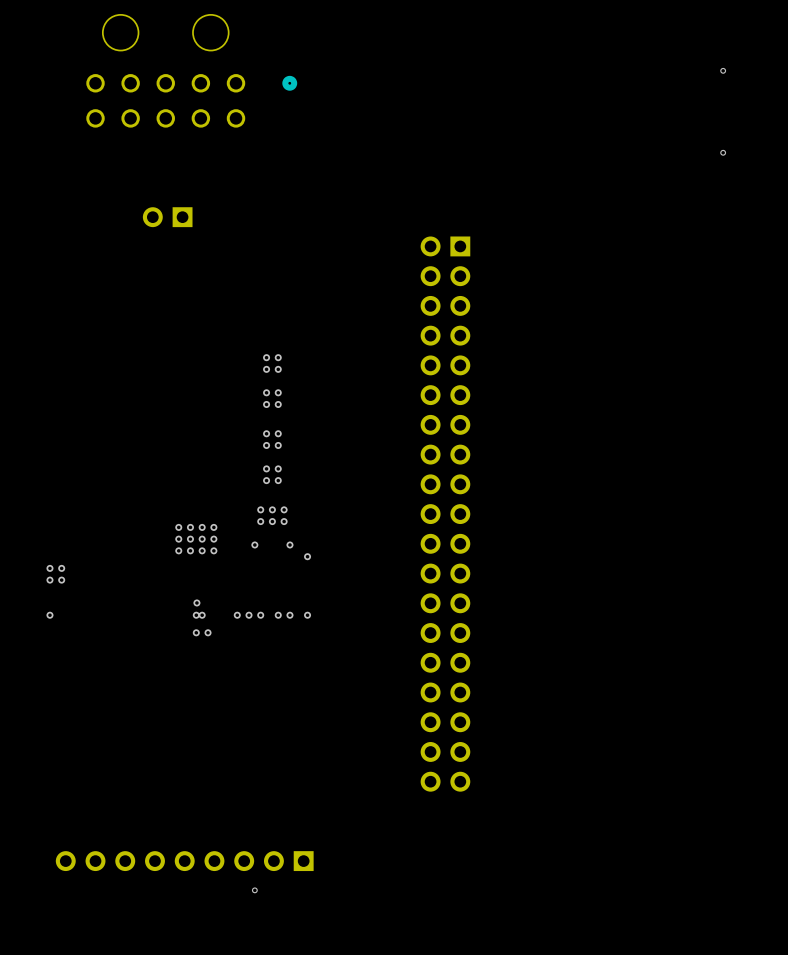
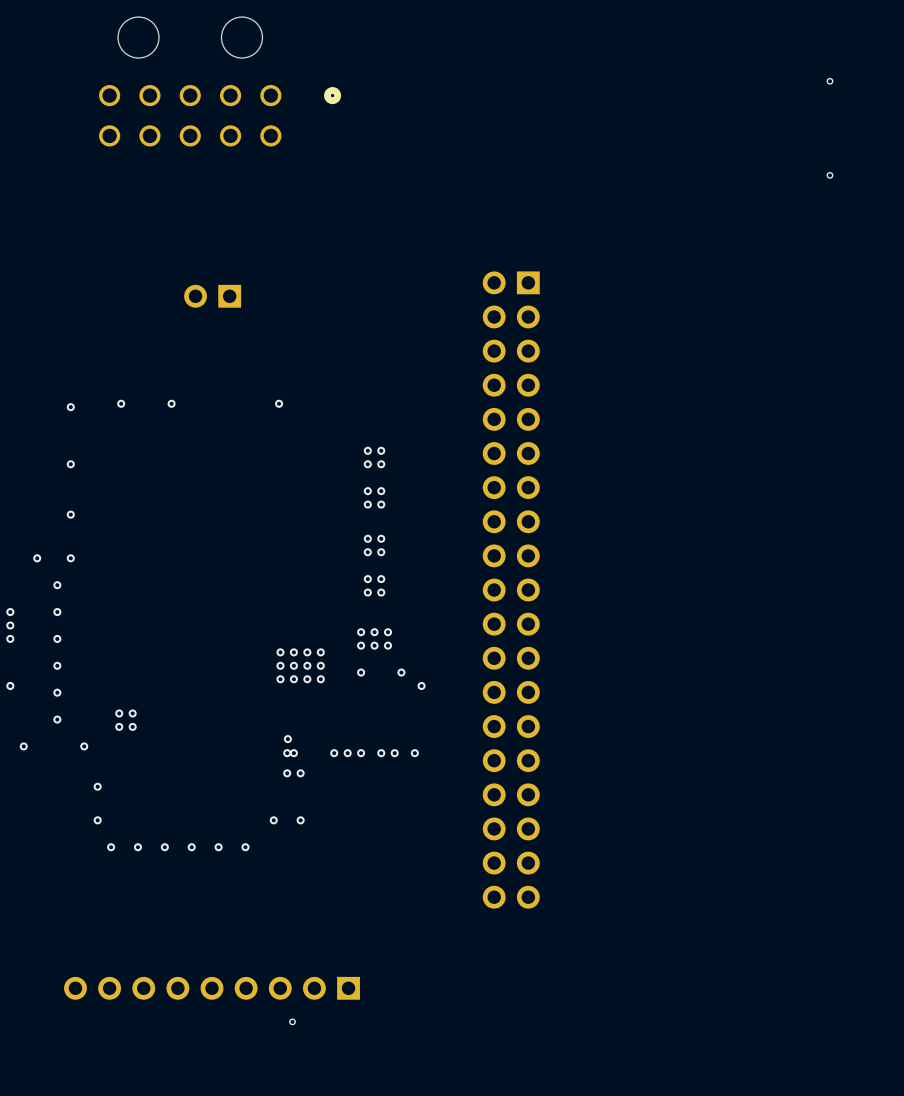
part position: (167, 217) -> (212, 296)
via: none -> (121, 403)
via: none -> (171, 403)
via: none -> (279, 403)
via: none -> (70, 407)
via: (266, 357) -> none
via: (278, 357) -> none
via: (266, 369) -> none
via: (278, 369) -> none
via: (266, 392) -> none
via: (278, 392) -> none
via: none -> (367, 450)
via: none -> (381, 450)
via: none -> (70, 464)
via: (266, 404) -> none
via: (278, 404) -> none
via: none -> (367, 464)
via: none -> (381, 464)
via: none -> (367, 491)
via: none -> (381, 491)
via: (266, 433) -> none
via: (278, 433) -> none
via: none -> (367, 504)
via: none -> (381, 504)
via: (266, 445) -> none
via: (278, 445) -> none
via: none -> (70, 514)
via: (266, 468) -> none
via: (278, 468) -> none
via: none -> (367, 538)
via: none -> (381, 538)
via: (266, 480) -> none
via: (278, 480) -> none
via: none -> (367, 552)
via: none -> (381, 552)
via: none -> (37, 558)
via: none -> (70, 558)
via: none -> (367, 579)
via: none -> (381, 579)
via: none -> (57, 585)
via: (260, 509) -> none
via: (272, 509) -> none
via: (284, 509) -> none
via: none -> (367, 592)
via: none -> (381, 592)
via: (260, 521) -> none
via: (272, 521) -> none
via: (284, 521) -> none
via: (178, 527) -> none
via: (190, 527) -> none
via: (202, 527) -> none
via: (213, 527) -> none
via: none -> (10, 612)
via: none -> (57, 612)
via: (178, 539) -> none
via: (190, 539) -> none
via: (202, 539) -> none
via: (213, 539) -> none
via: none -> (10, 625)
via: (254, 544) -> none
via: (289, 544) -> none
via: (178, 550) -> none
via: (190, 550) -> none
via: (202, 550) -> none
via: (213, 550) -> none
via: none -> (361, 632)
via: none -> (374, 632)
via: none -> (387, 632)
via: none -> (10, 638)
via: none -> (57, 638)
via: (307, 556) -> none
via: none -> (361, 645)
via: none -> (374, 645)
via: none -> (387, 645)
via: (49, 568) -> none
via: (61, 568) -> none
via: none -> (280, 652)
via: none -> (293, 652)
via: none -> (307, 652)
via: none -> (320, 652)
via: (61, 580) -> none
via: none -> (280, 665)
via: none -> (293, 665)
via: none -> (307, 665)
via: none -> (320, 665)
via: none -> (361, 672)
via: none -> (401, 672)
via: none -> (280, 679)
via: none -> (293, 679)
via: none -> (307, 679)
via: none -> (320, 679)
via: none -> (10, 685)
via: none -> (421, 685)
via: (196, 602) -> none
via: none -> (57, 692)
via: (49, 615) -> none
via: (196, 615) -> none
via: (202, 615) -> none
via: (237, 615) -> none
via: (249, 615) -> none
via: (260, 615) -> none
via: (278, 615) -> none
via: (289, 615) -> none
via: (307, 615) -> none
via: none -> (119, 713)
via: none -> (132, 713)
via: none -> (57, 719)
via: (196, 632) -> none
via: (208, 632) -> none
via: none -> (119, 726)
via: none -> (132, 726)
via: none -> (287, 739)
via: none -> (23, 746)
via: none -> (84, 746)
via: none -> (287, 753)
via: none -> (293, 753)
via: none -> (334, 753)
via: none -> (347, 753)
via: none -> (361, 753)
via: none -> (381, 753)
via: none -> (394, 753)
via: none -> (414, 753)
via: none -> (287, 773)
via: none -> (300, 773)
via: none -> (97, 786)
via: none -> (97, 820)
via: none -> (273, 820)
via: none -> (300, 820)
via: none -> (111, 847)
via: none -> (137, 847)
via: none -> (164, 847)
via: none -> (191, 847)
via: none -> (218, 847)
via: none -> (245, 847)

